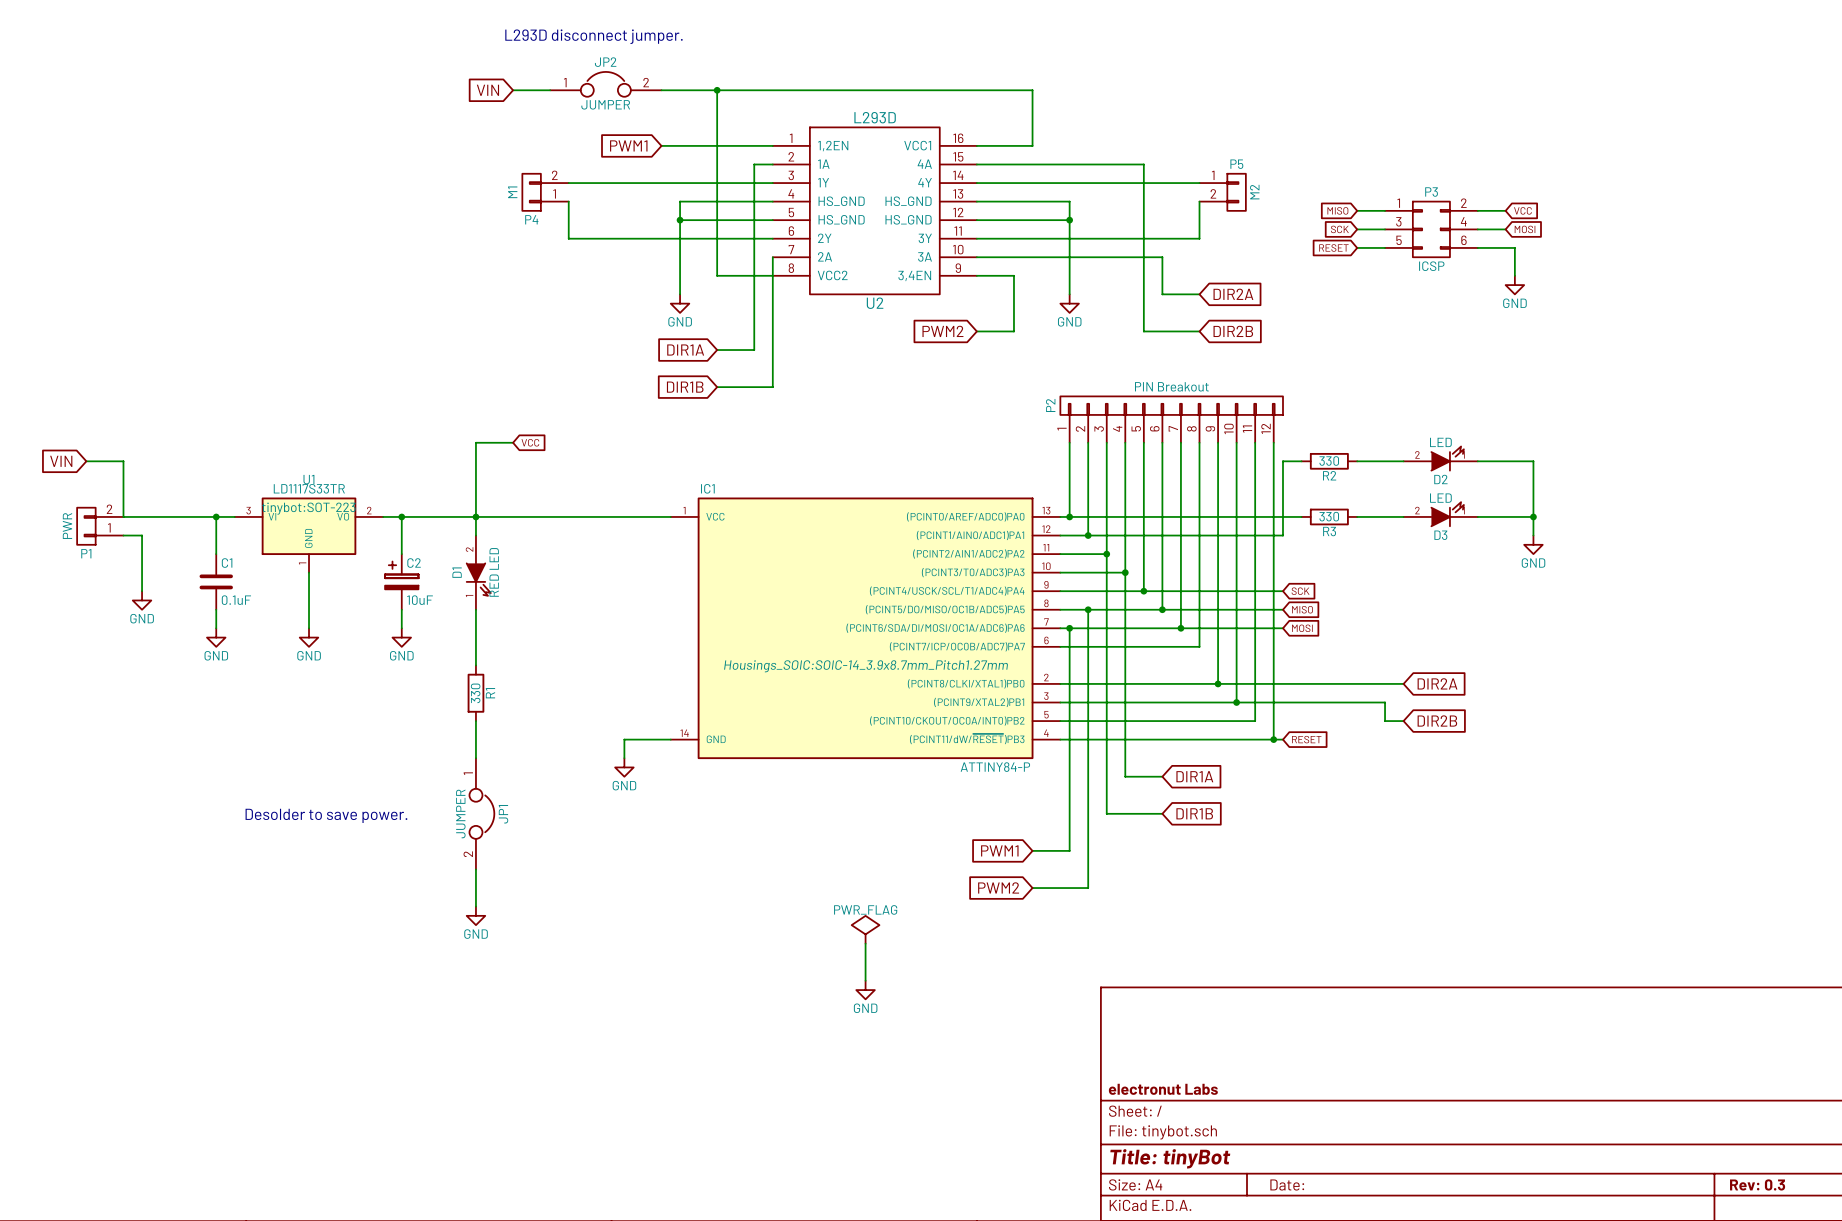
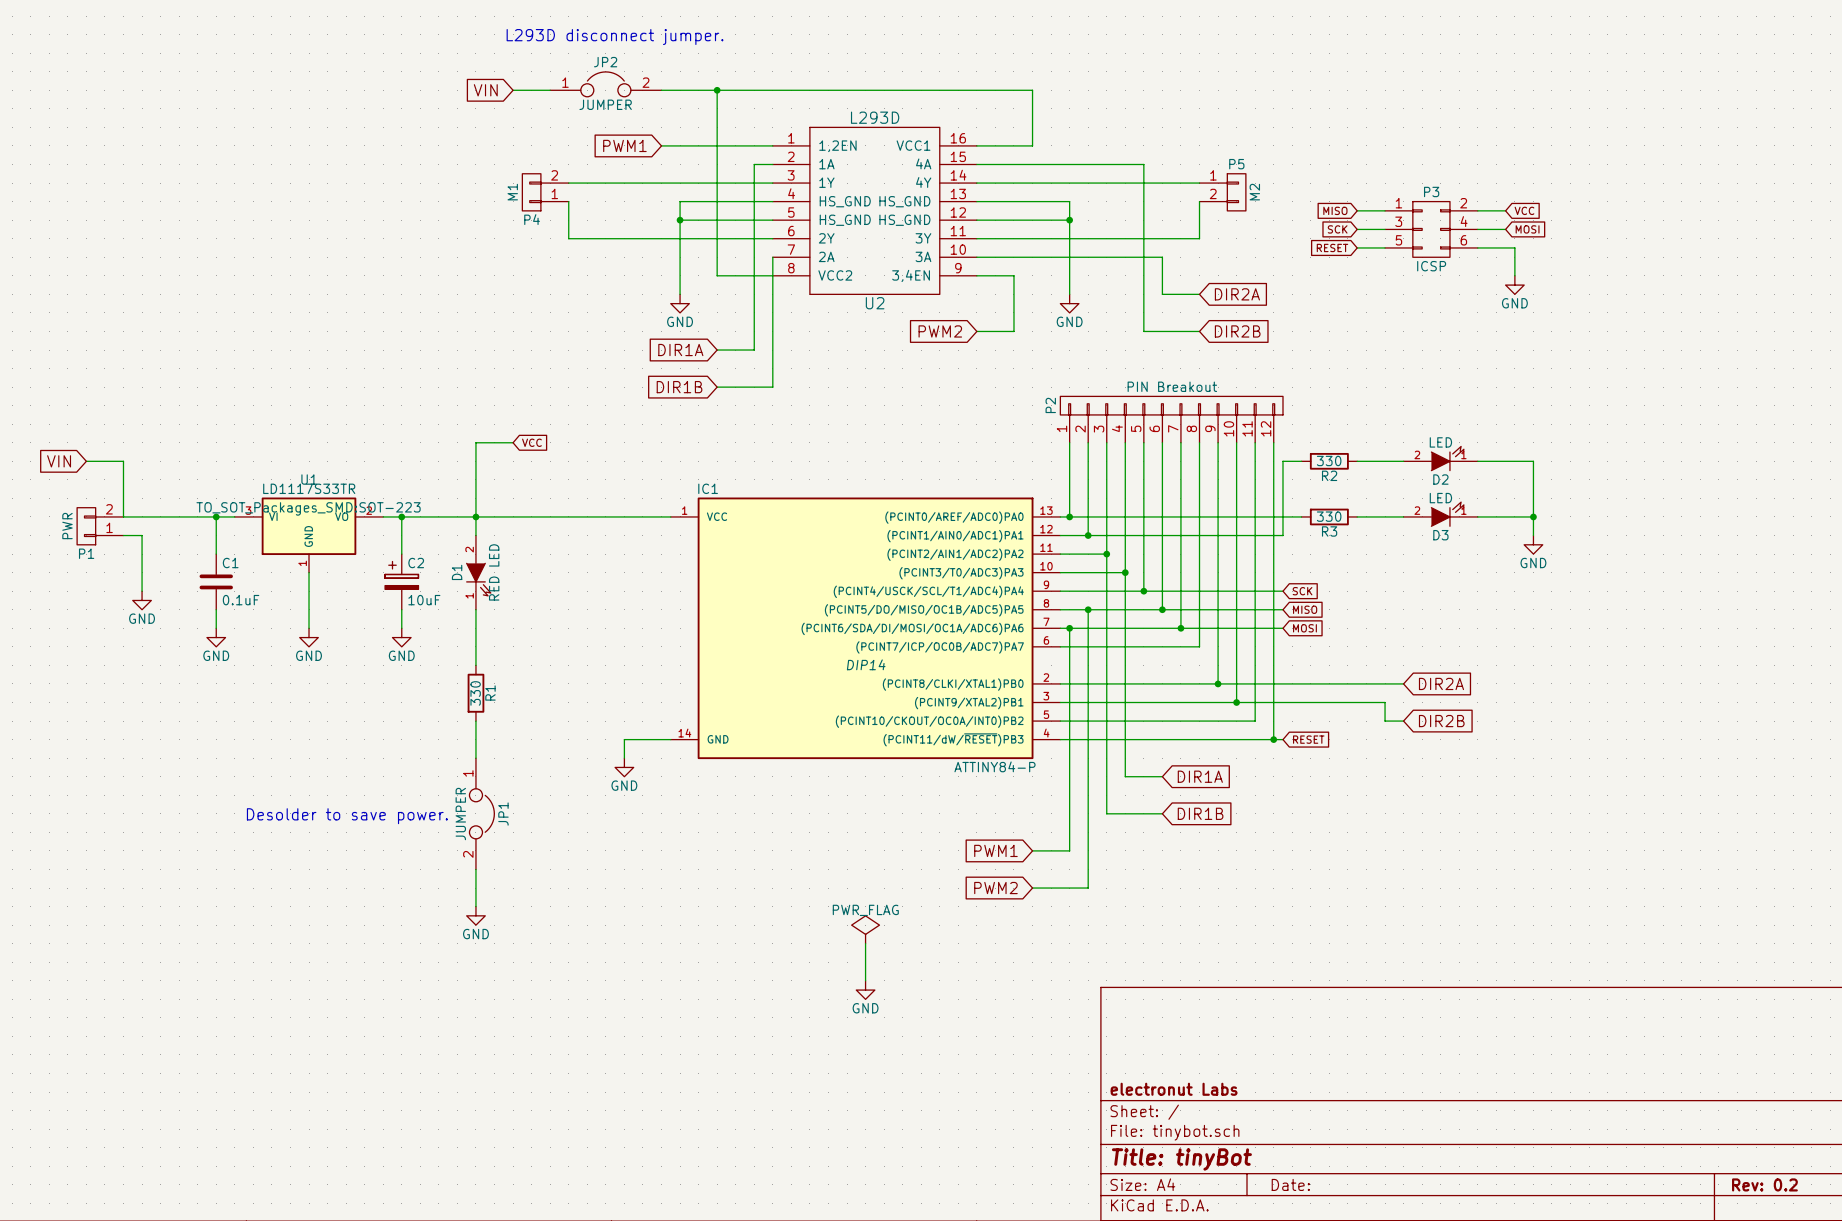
U1 text: tinybot:SOT-223 (308, 508) -> TO_SOT_Packages_SMD:SOT-223 (308, 508)
IC1 text: Housings_SOIC:SOIC-14_3.9x8.7mm_Pitch1.27mm (866, 666) -> DIP14 (866, 664)
title block: Rev: 0.3 (1757, 1184) -> Rev: 0.2 (1764, 1184)

